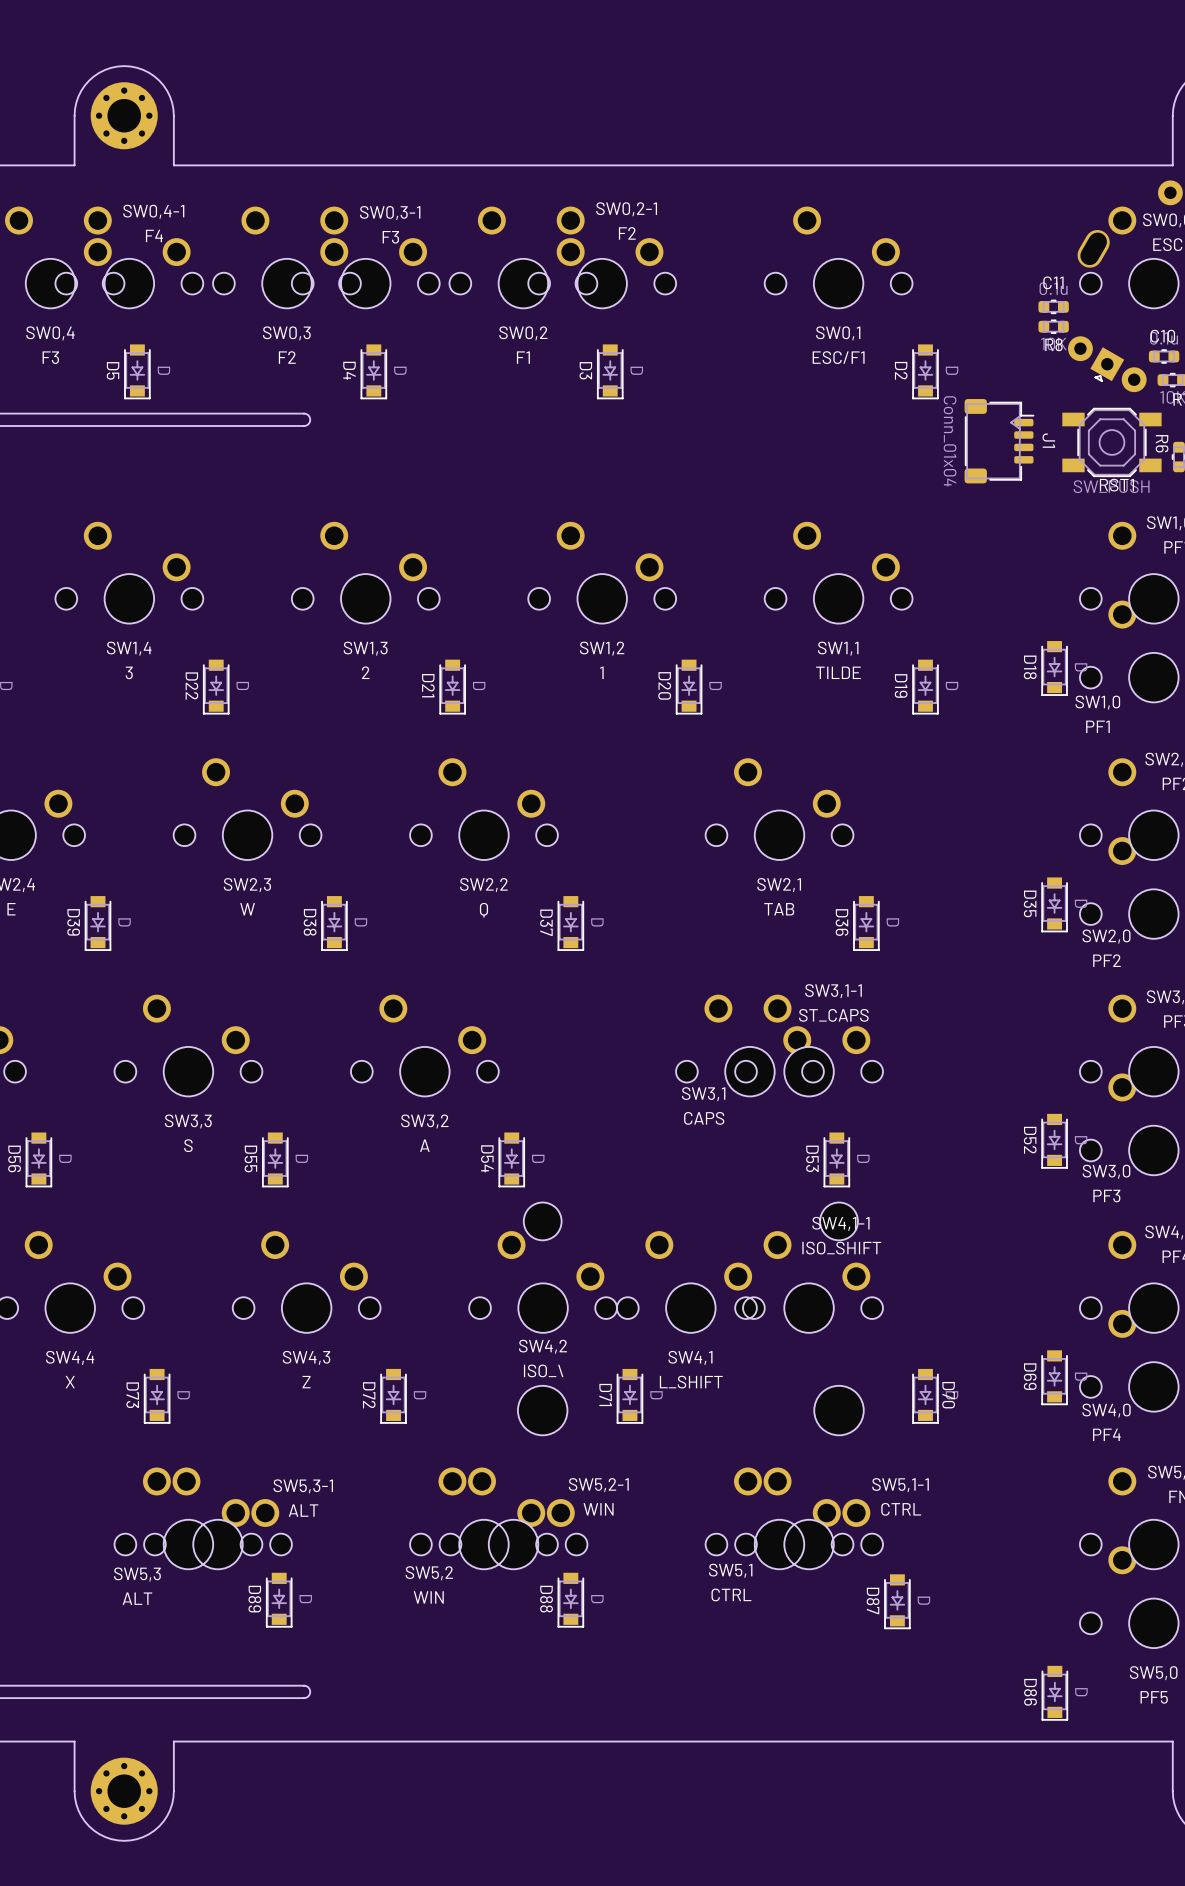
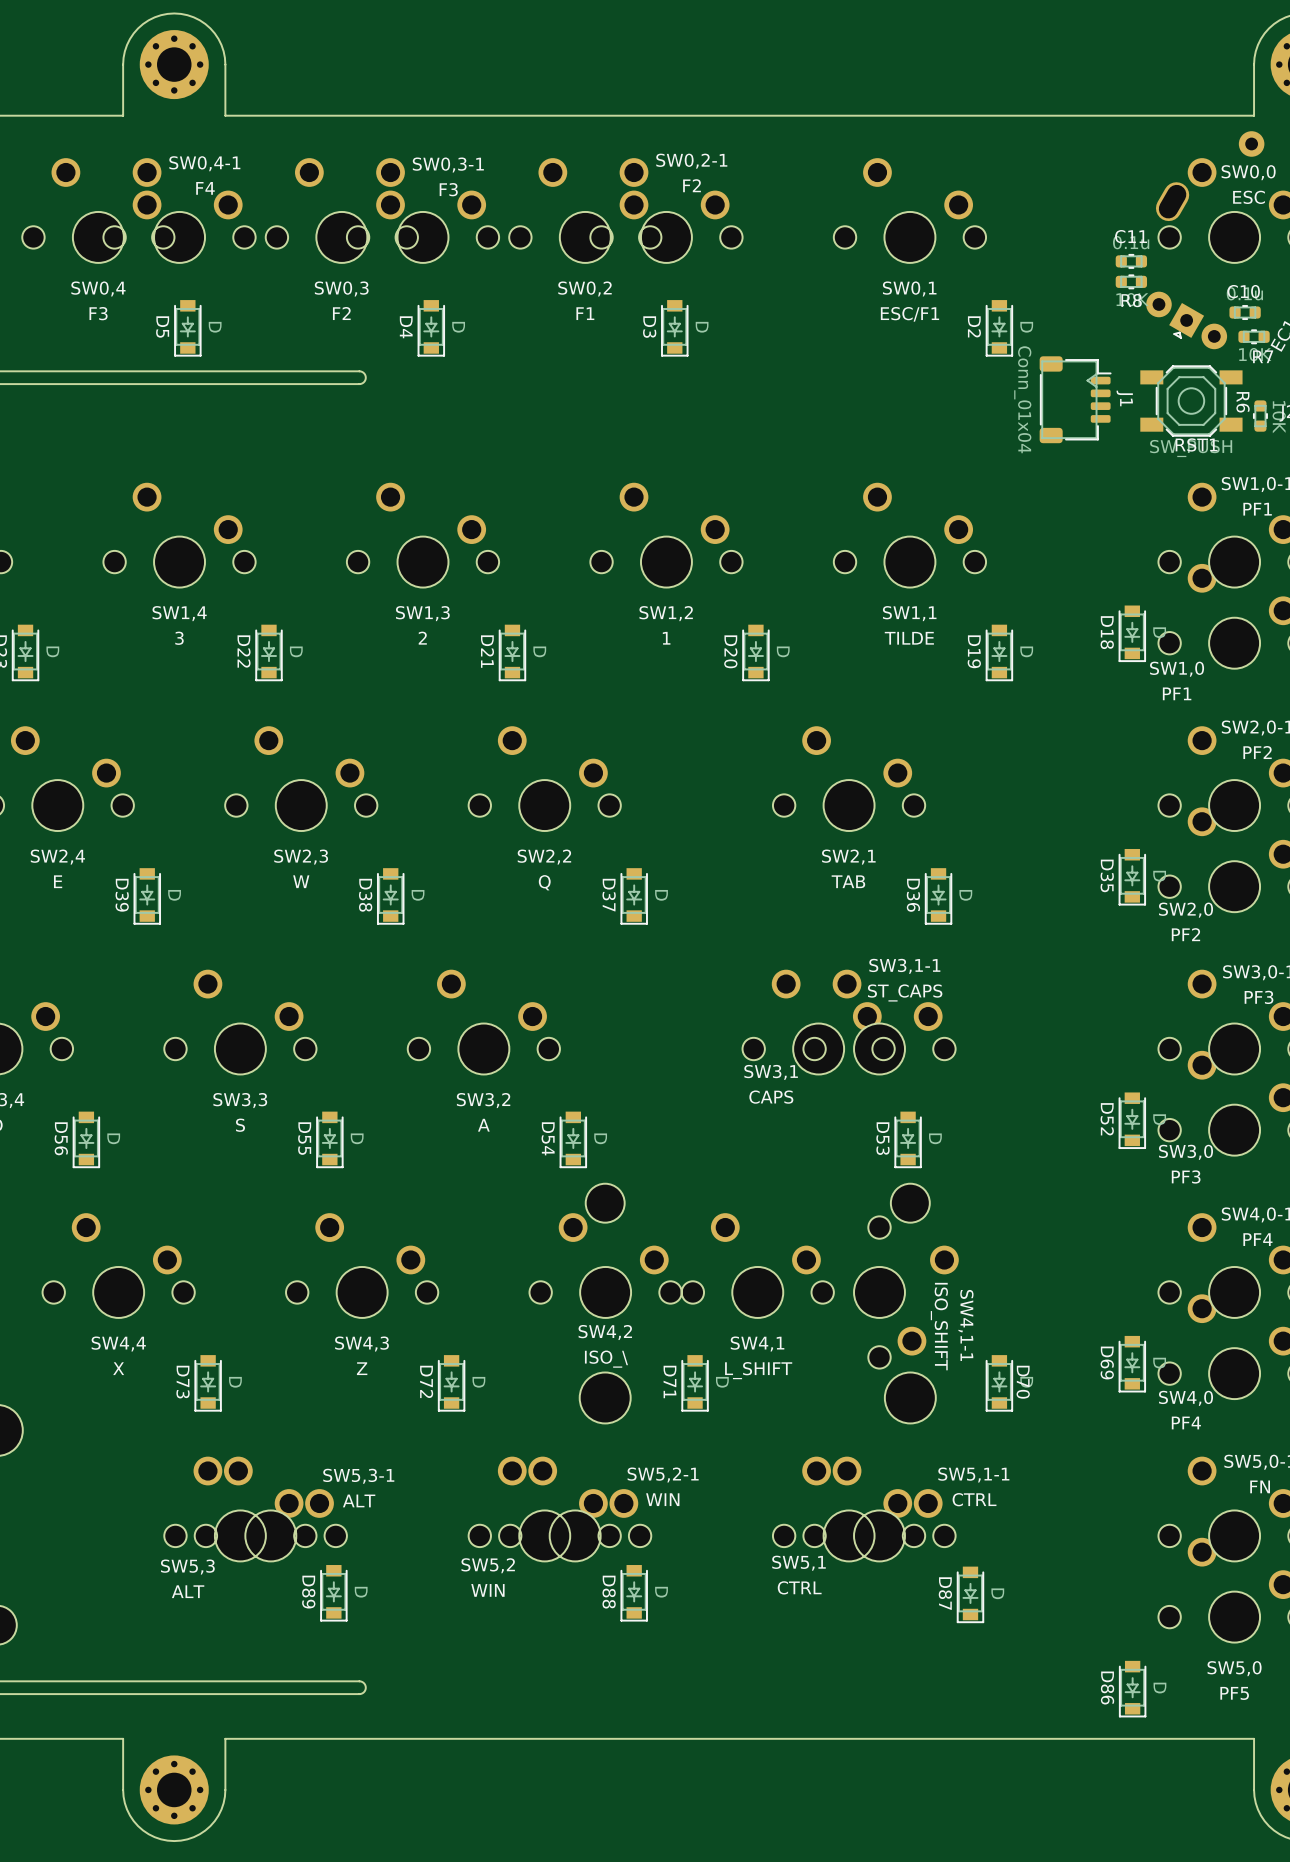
SW4,1-1 rotation: 0° (809, 1281) -> 90° clockwise (906, 1292)

